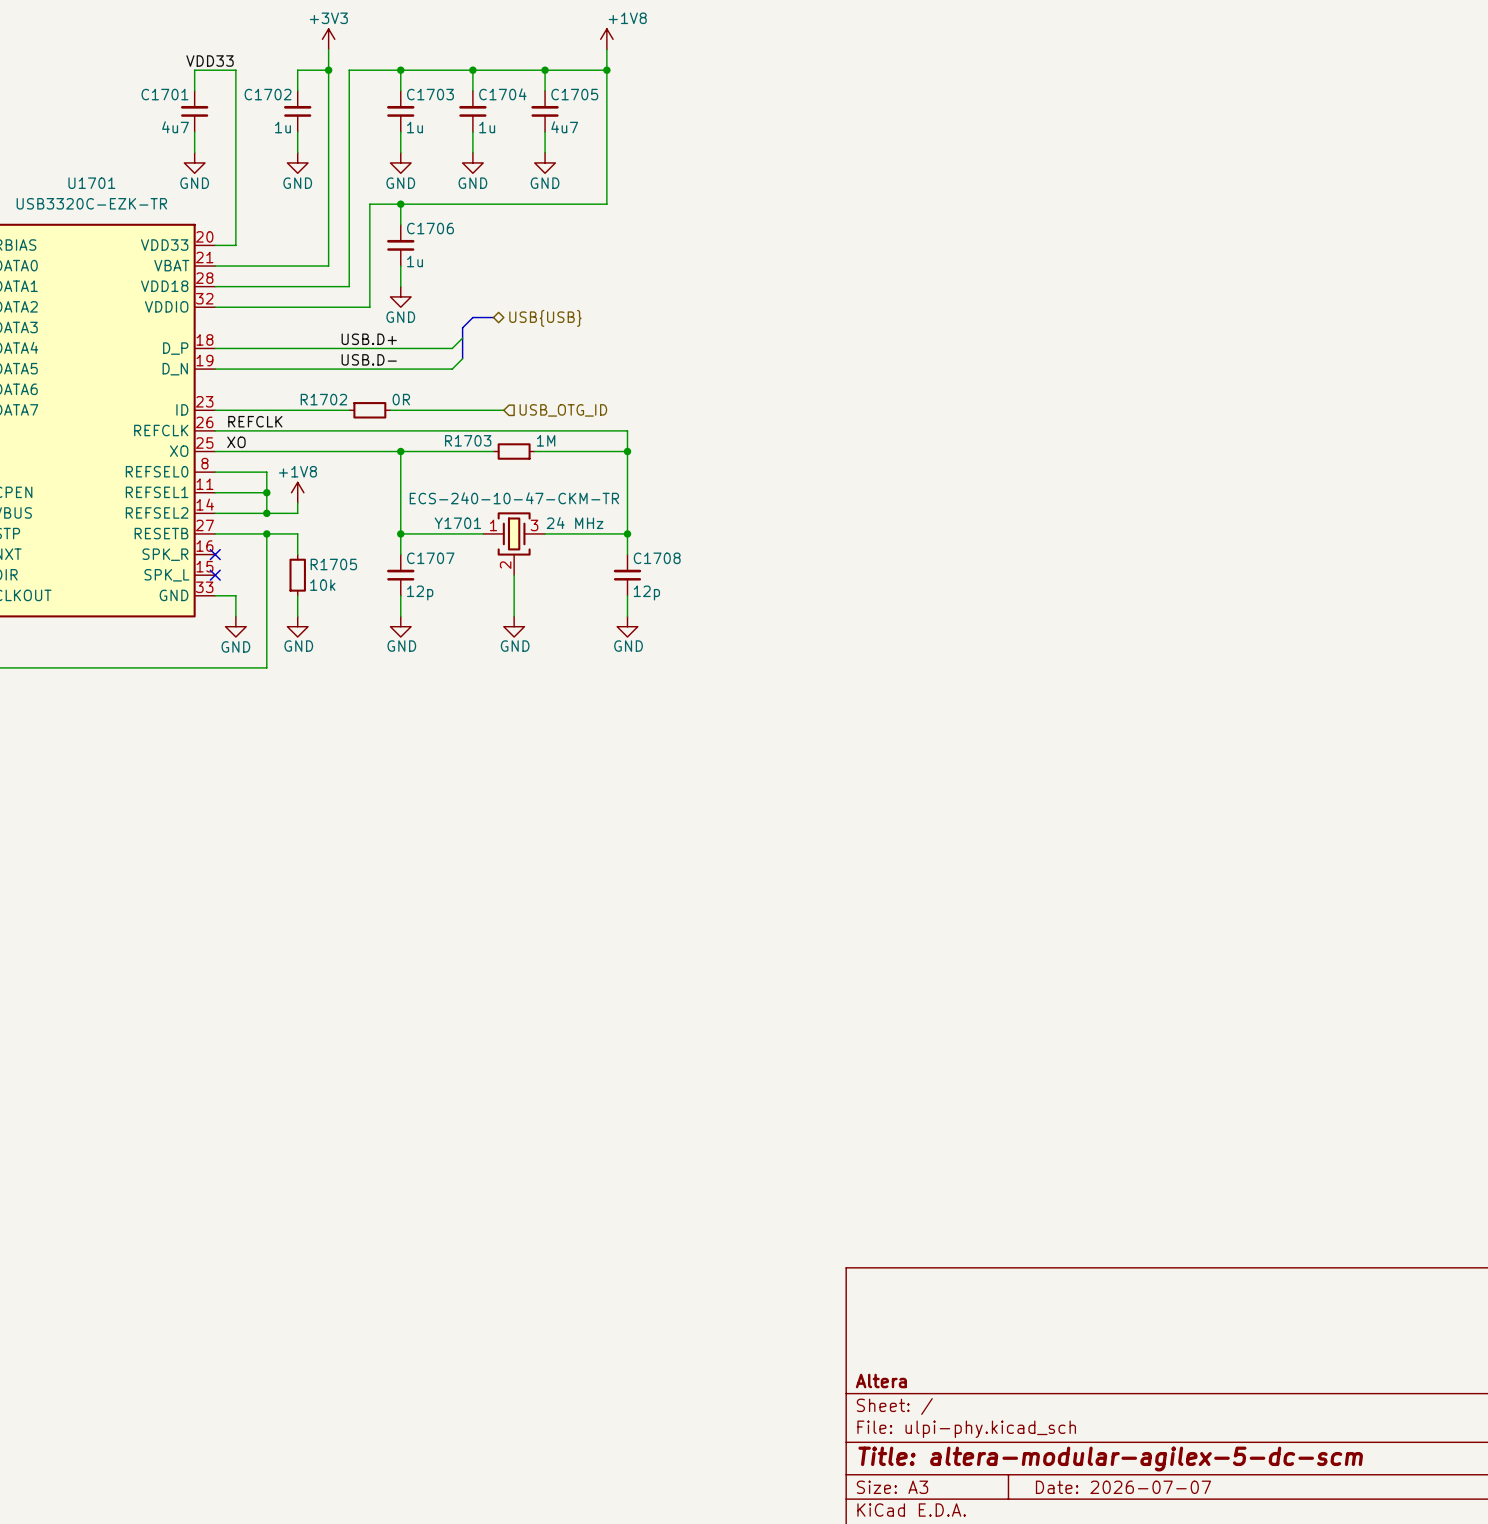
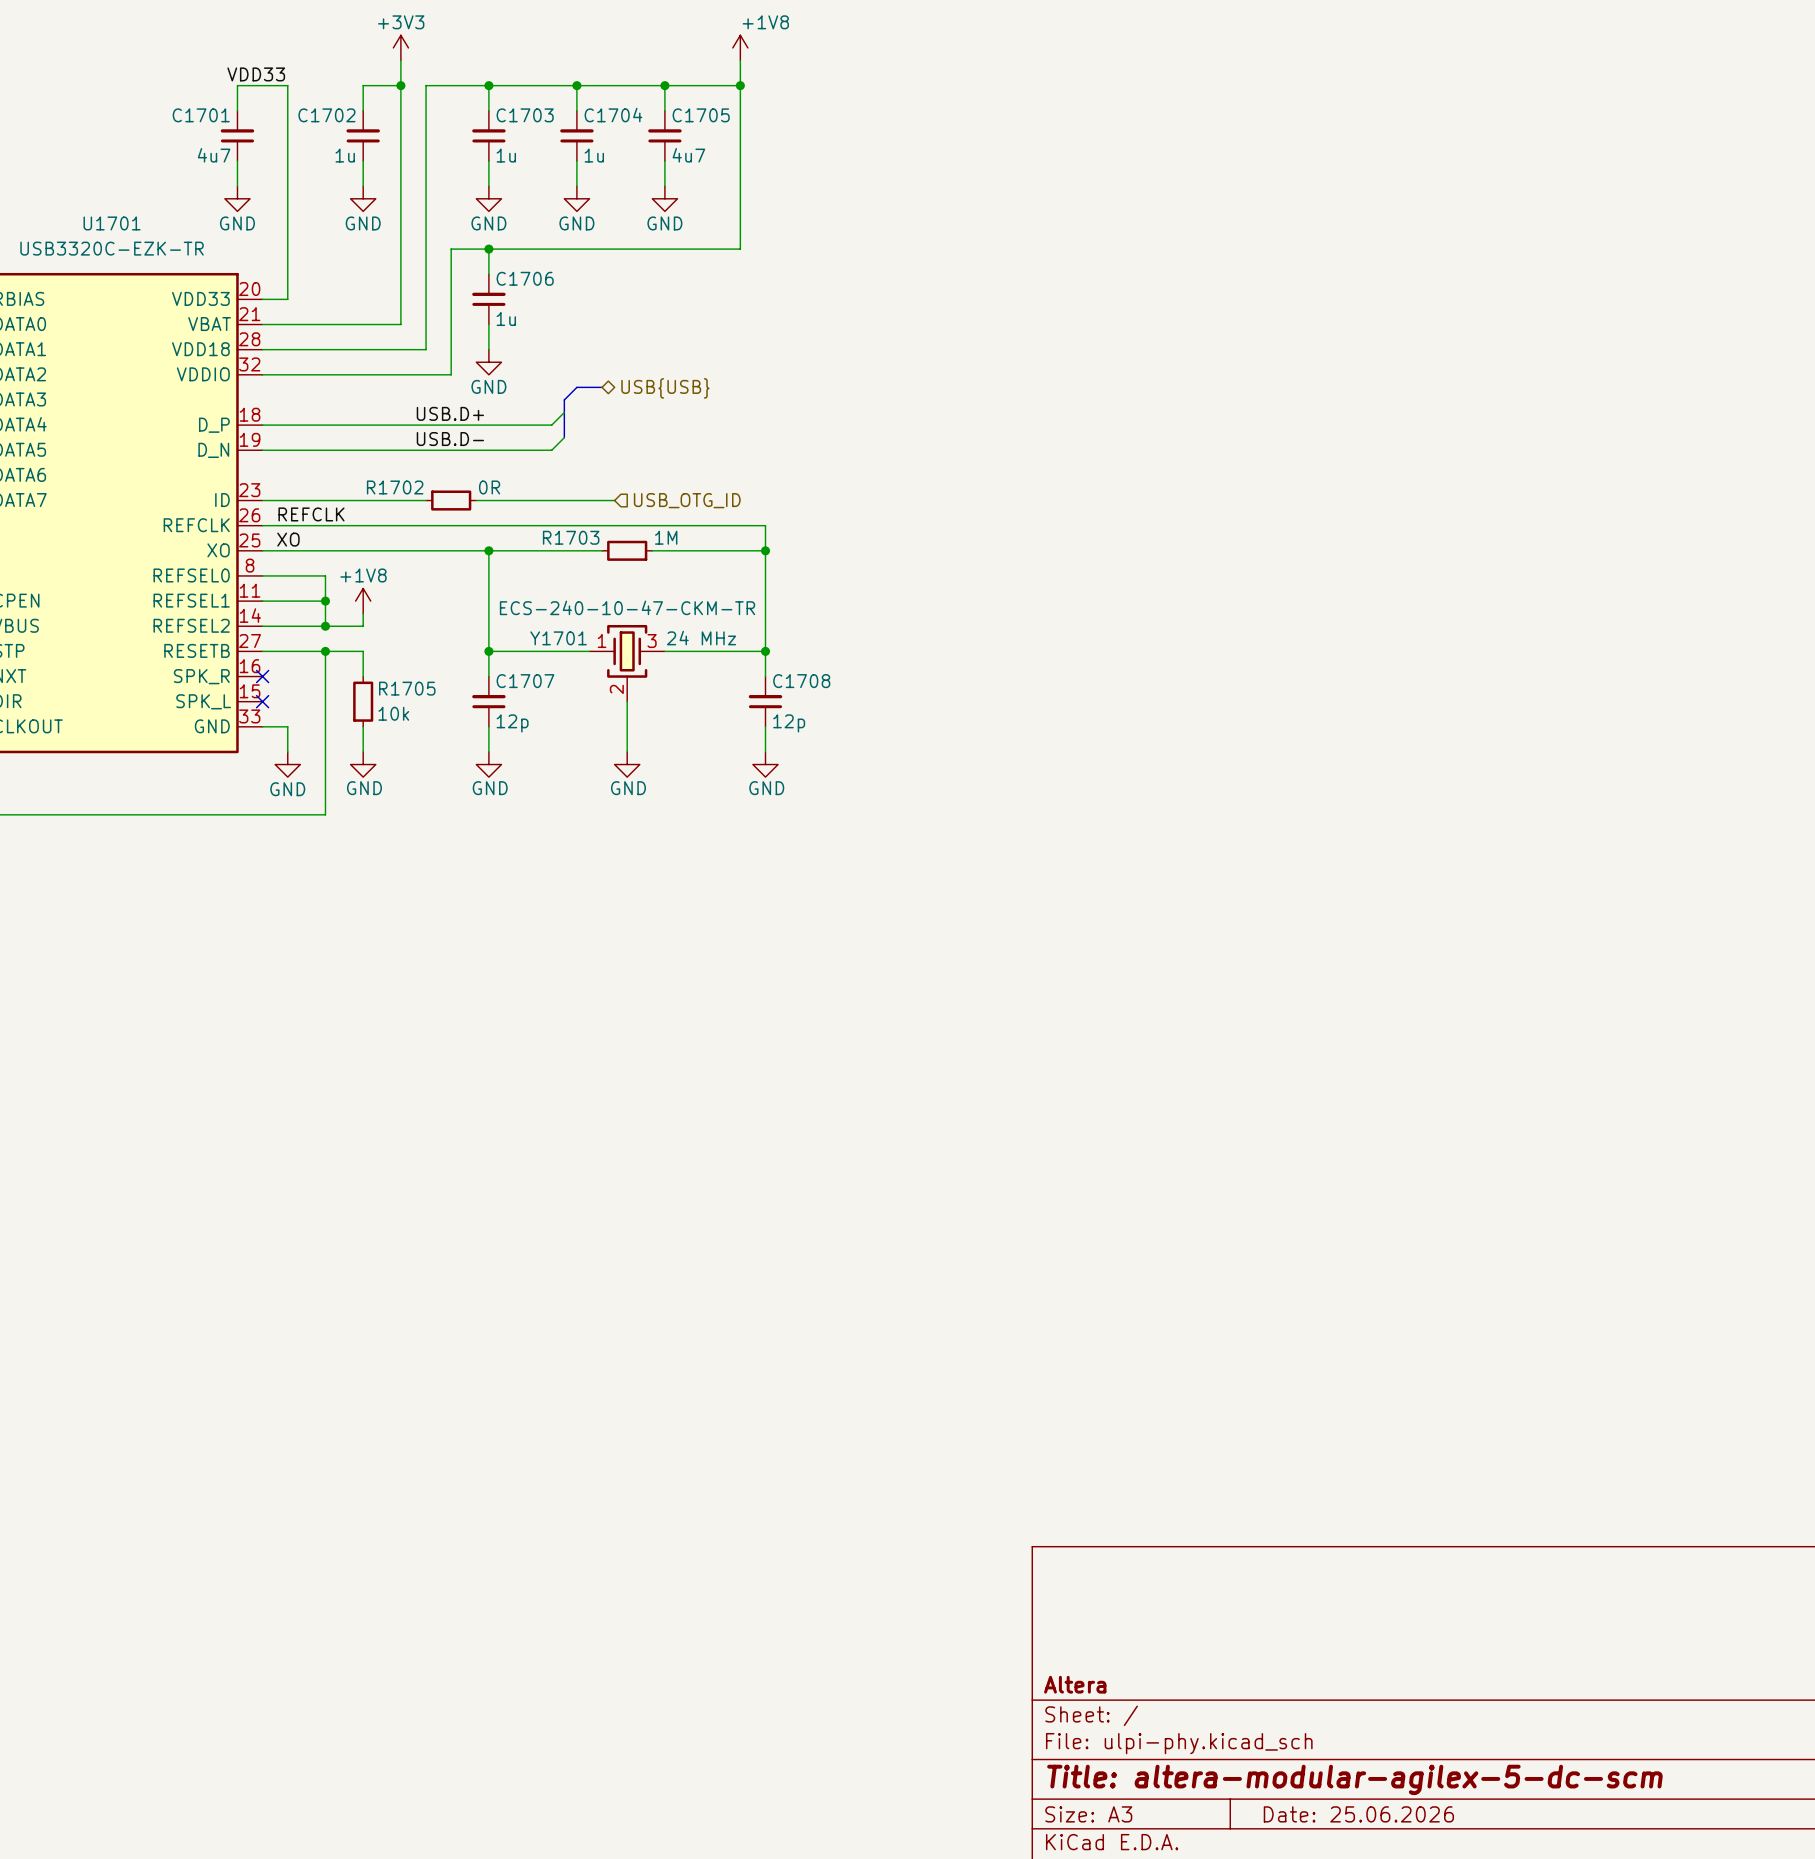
title block: Date: 2026-07-07 (1123, 1487) -> Date: 25.06.2026 (1358, 1814)

